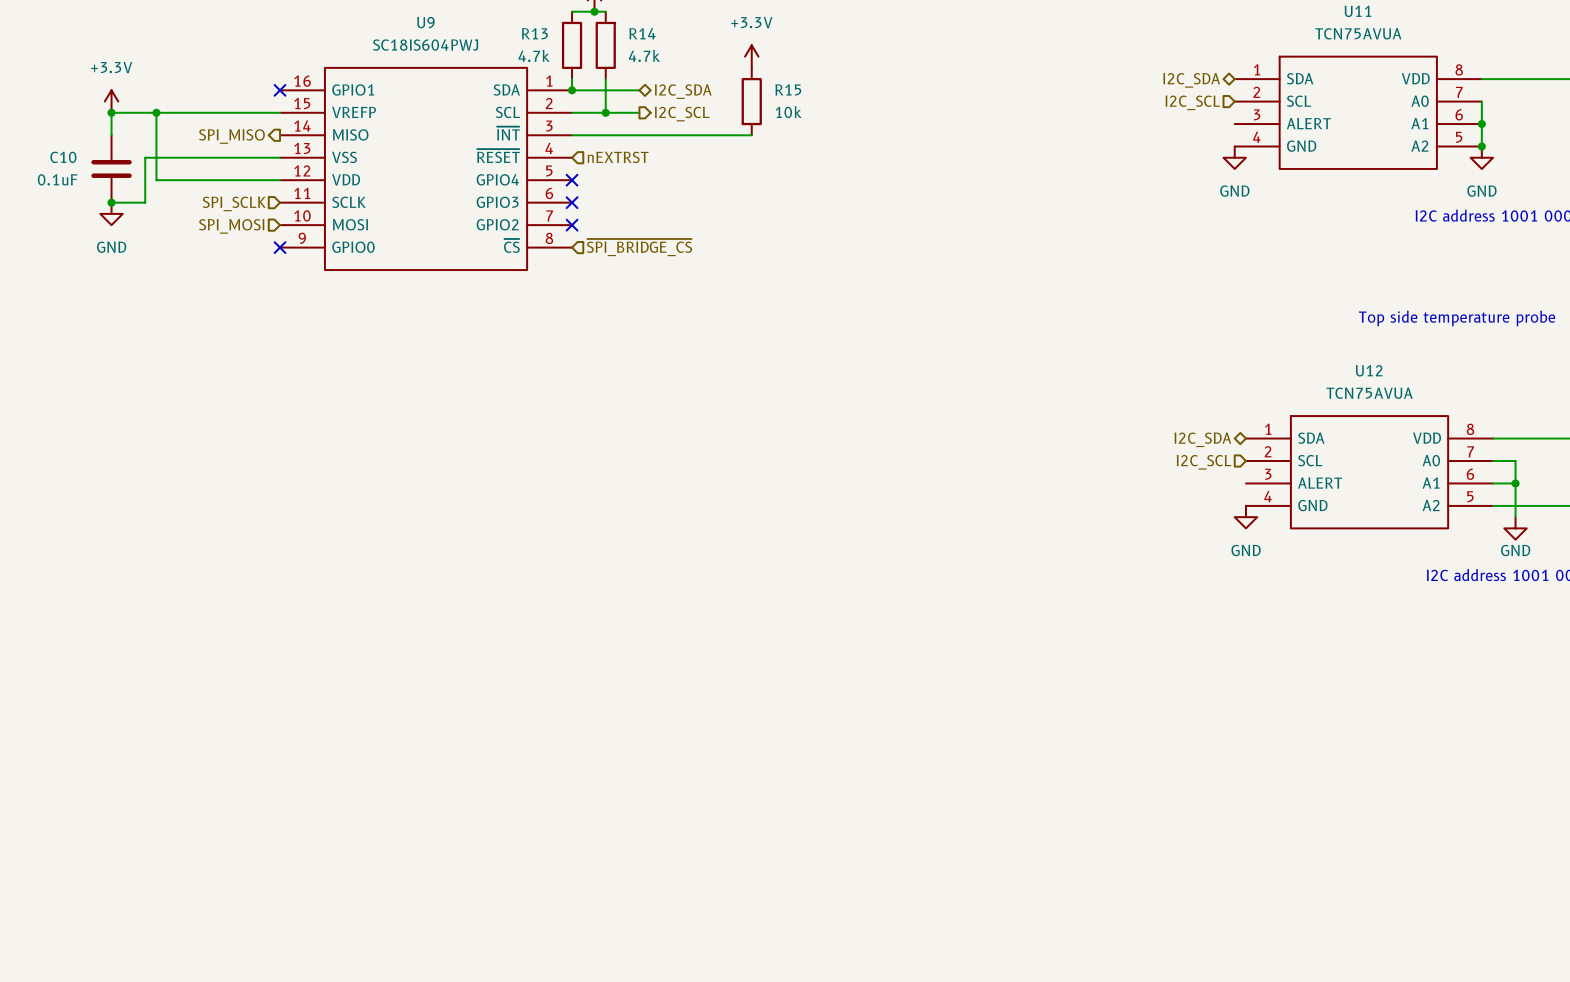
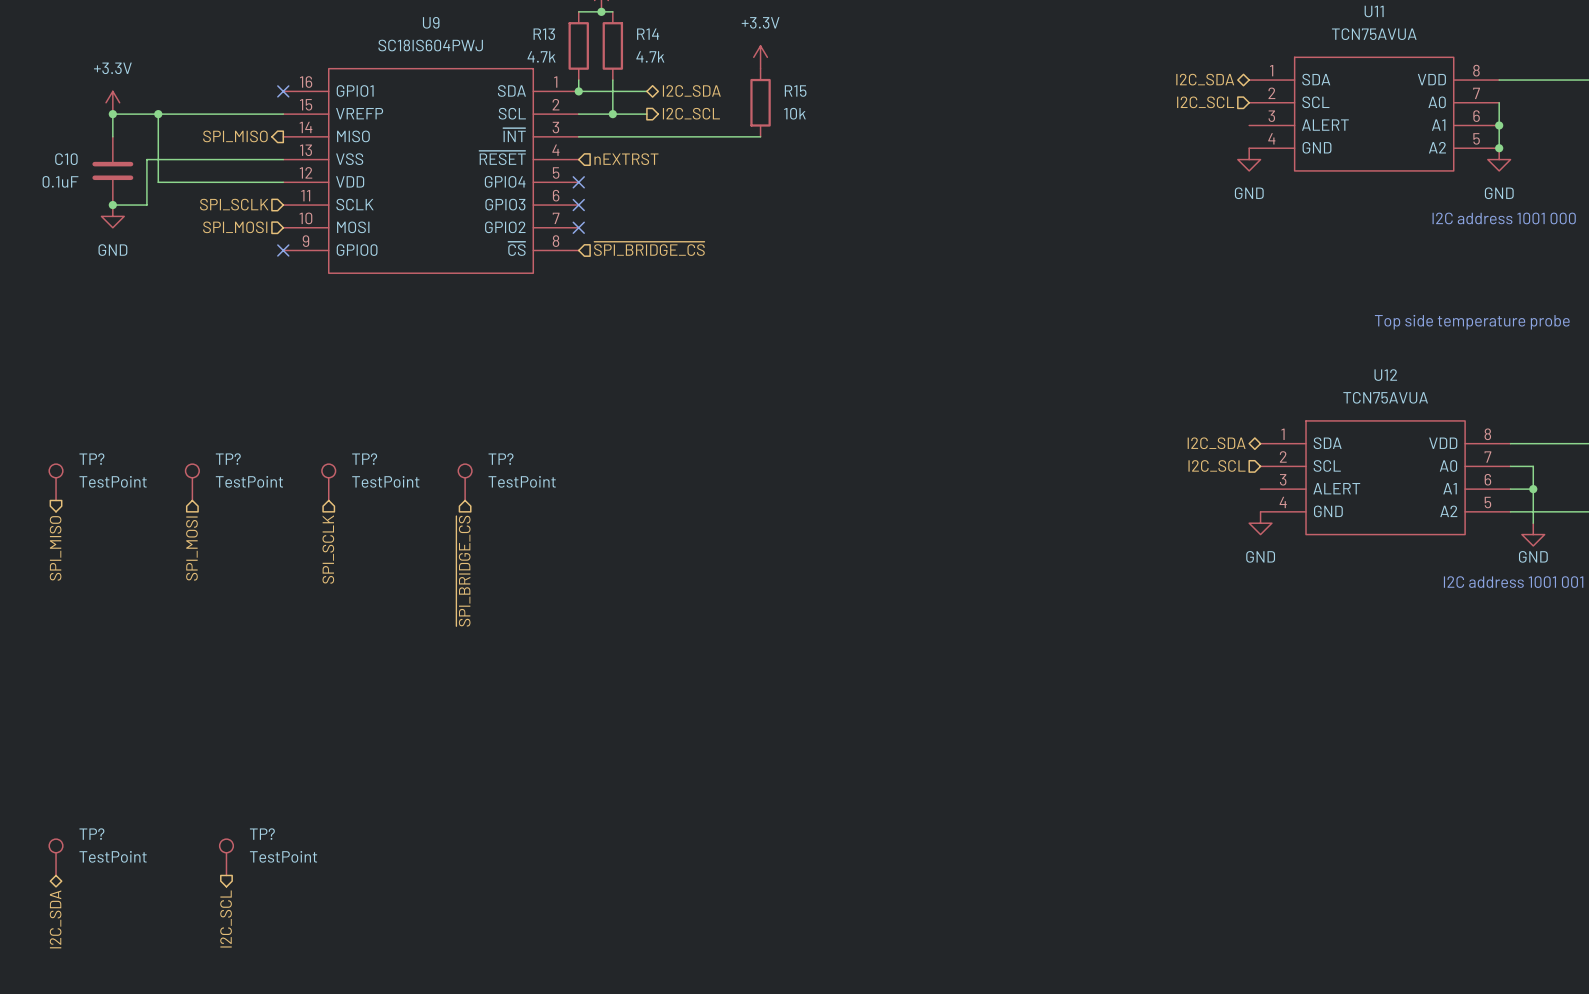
TP?: none -> TestPoint (56, 482)
TP?: none -> TestPoint (192, 482)
TP?: none -> TestPoint (328, 482)
TP?: none -> TestPoint (465, 482)
hierarchical label: none -> SPI_SCLK (328, 549)
hierarchical label: none -> SPI_MISO (55, 548)
hierarchical label: none -> SPI_MOSI (191, 548)
hierarchical label: none -> ~{SPI_BRIDGE_CS} (463, 571)
TP?: none -> TestPoint (56, 857)
TP?: none -> TestPoint (226, 857)
hierarchical label: none -> I2C_SCL (226, 919)
hierarchical label: none -> I2C_SDA (55, 919)

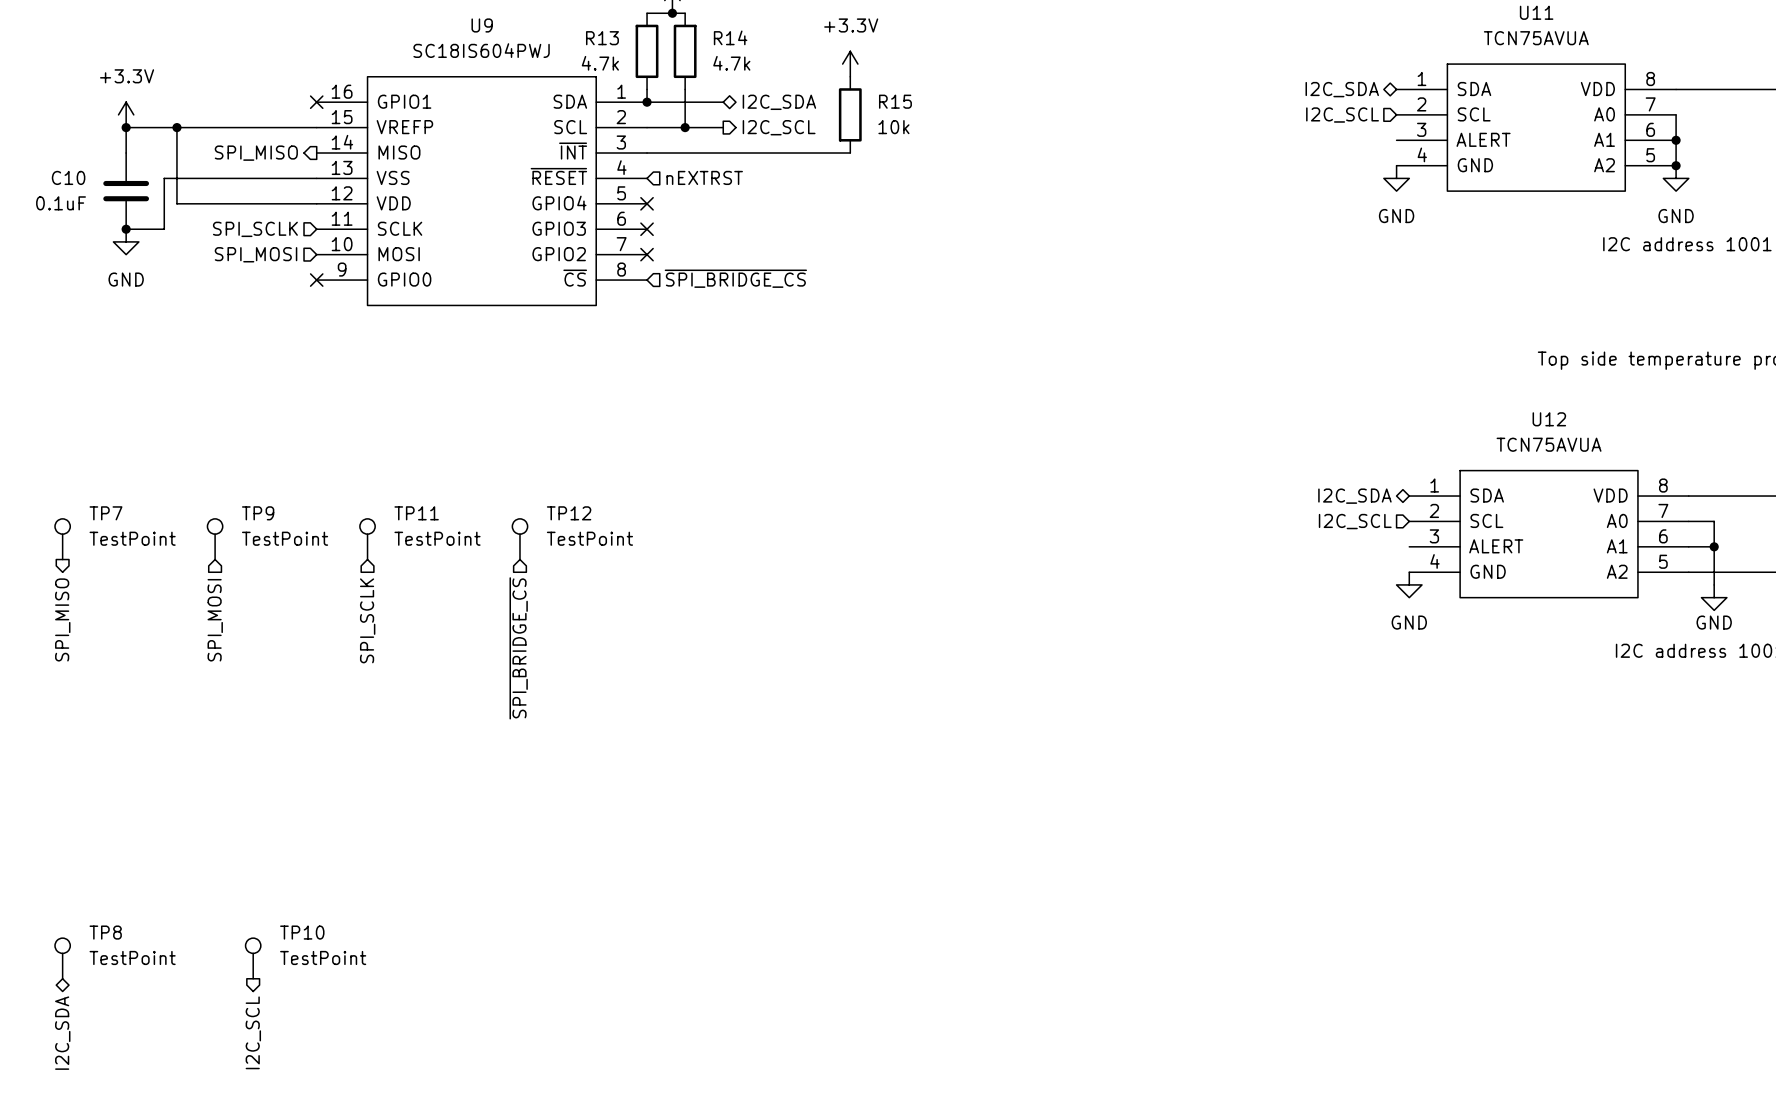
TP? name: TP? (91, 459) -> TP7 (105, 513)
TP? name: TP? (228, 459) -> TP9 (258, 513)
TP? name: TP? (364, 459) -> TP11 (416, 513)
TP? name: TP? (501, 459) -> TP12 (569, 513)
TP? name: TP? (91, 834) -> TP8 (105, 932)
TP? name: TP? (262, 834) -> TP10 (302, 932)

